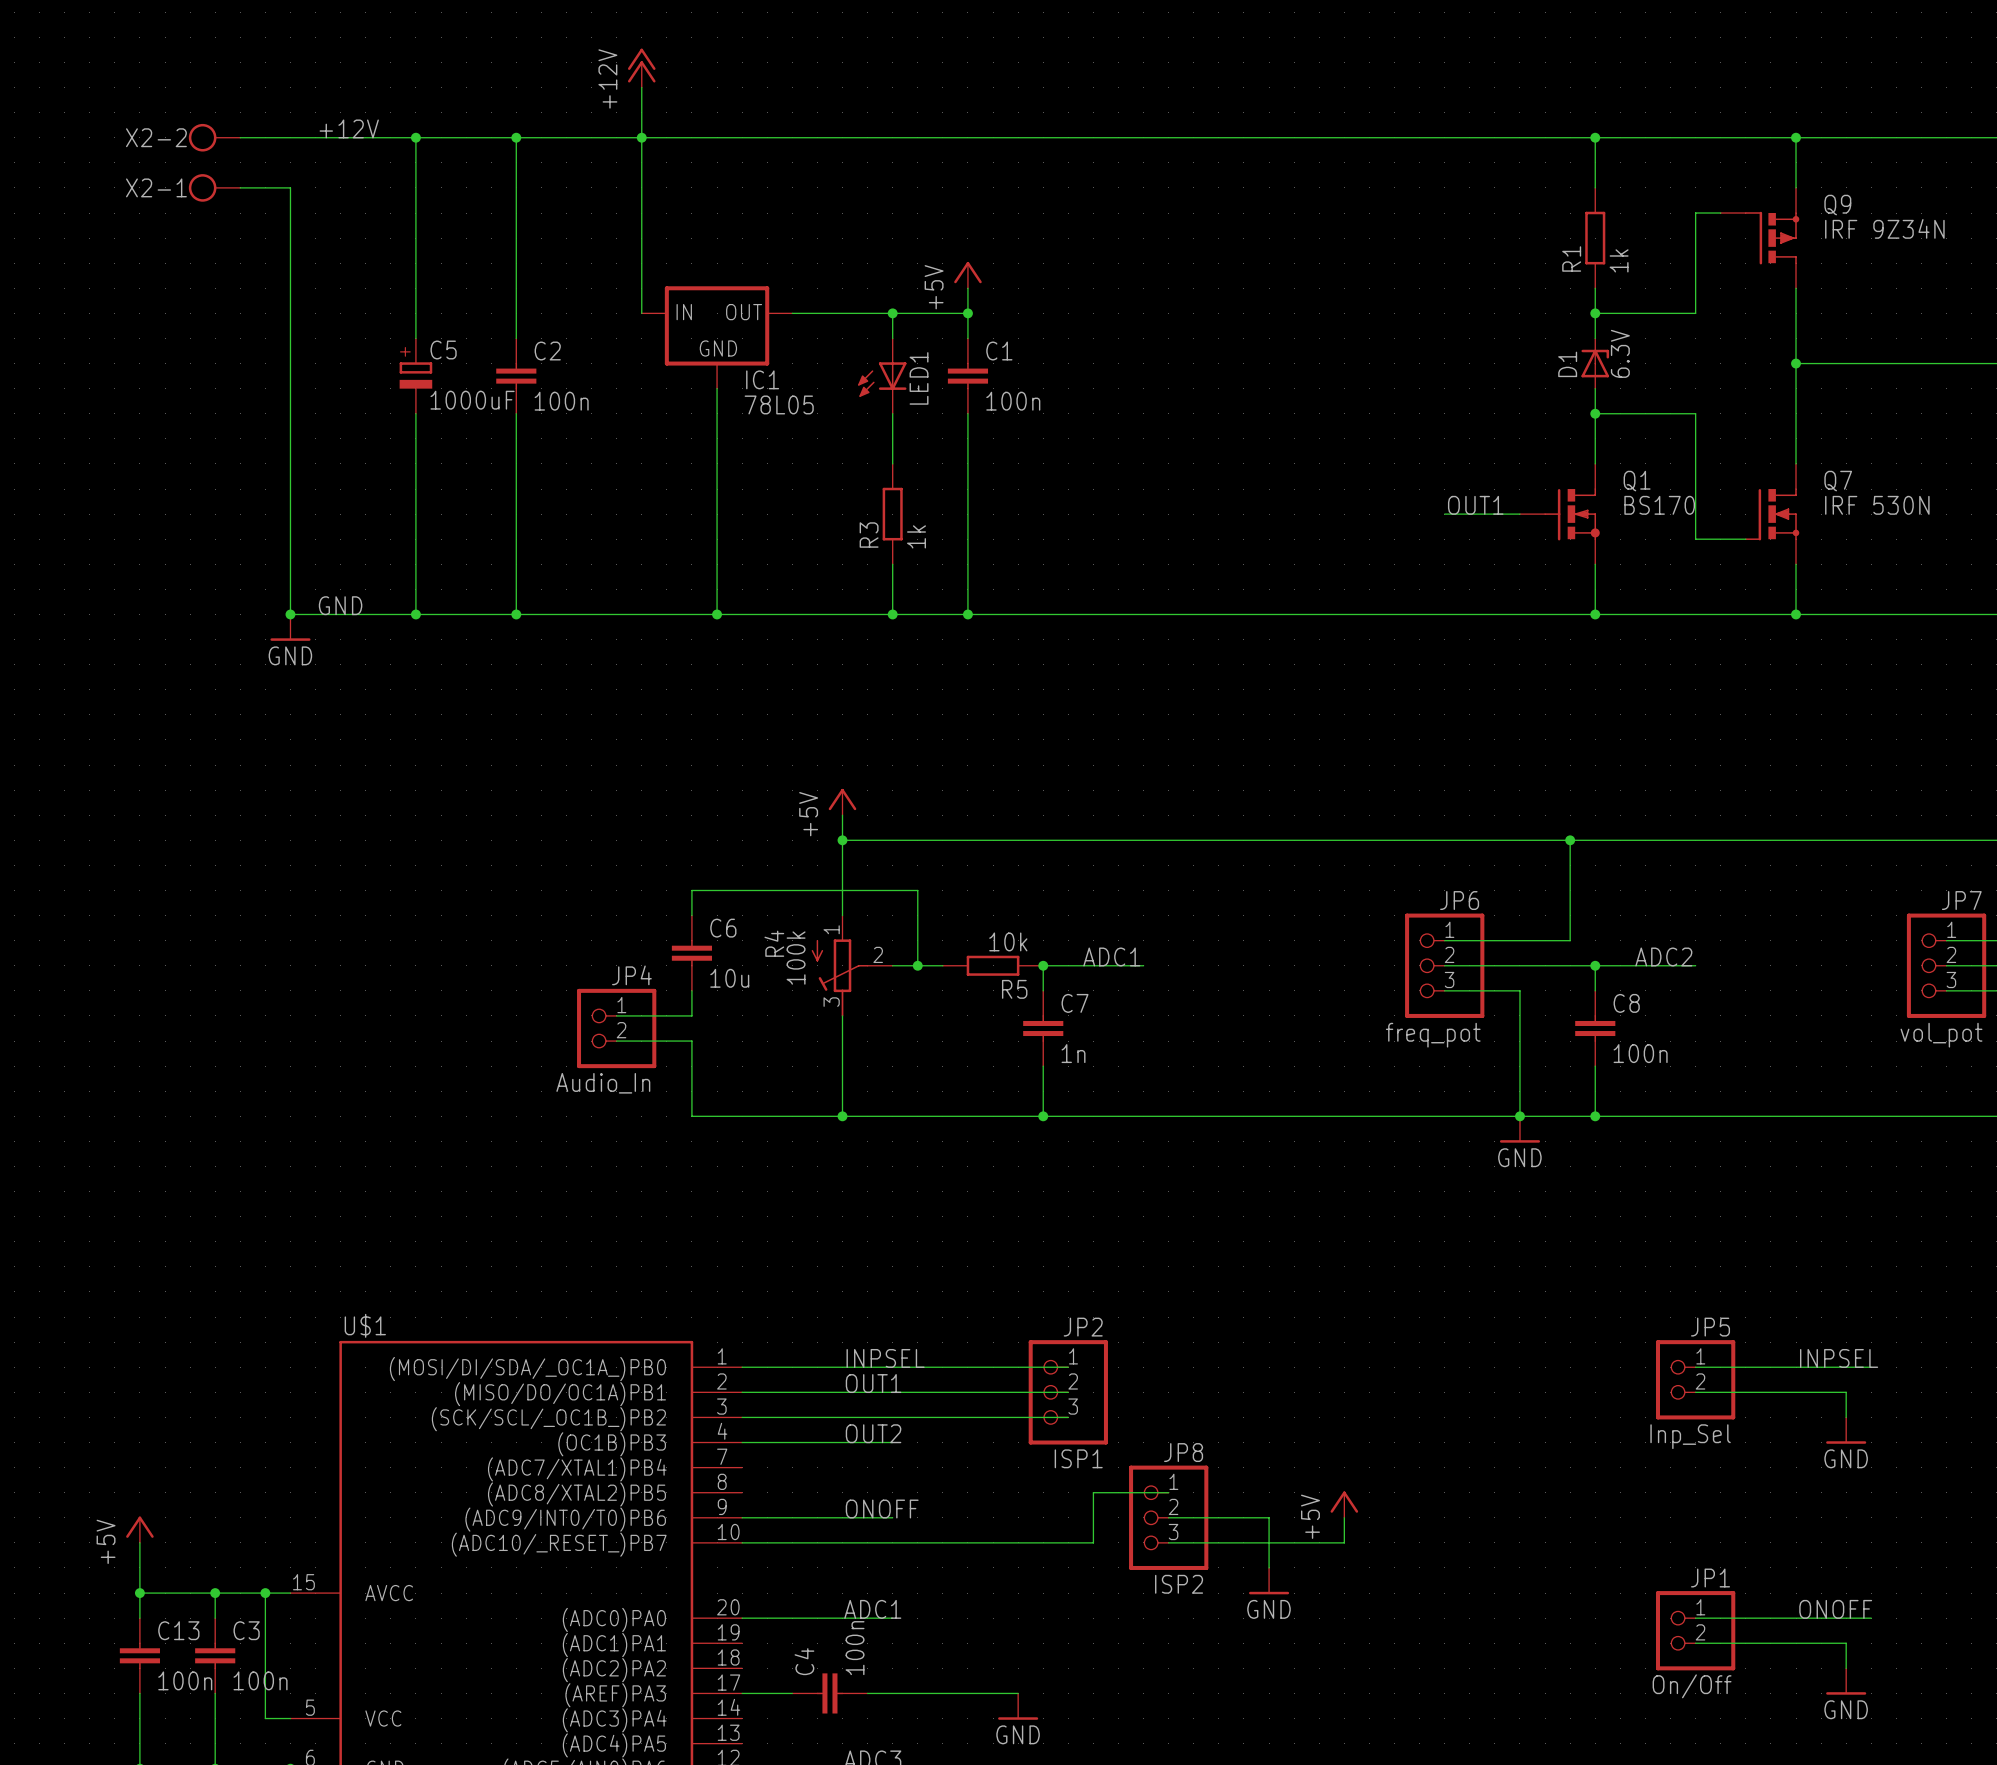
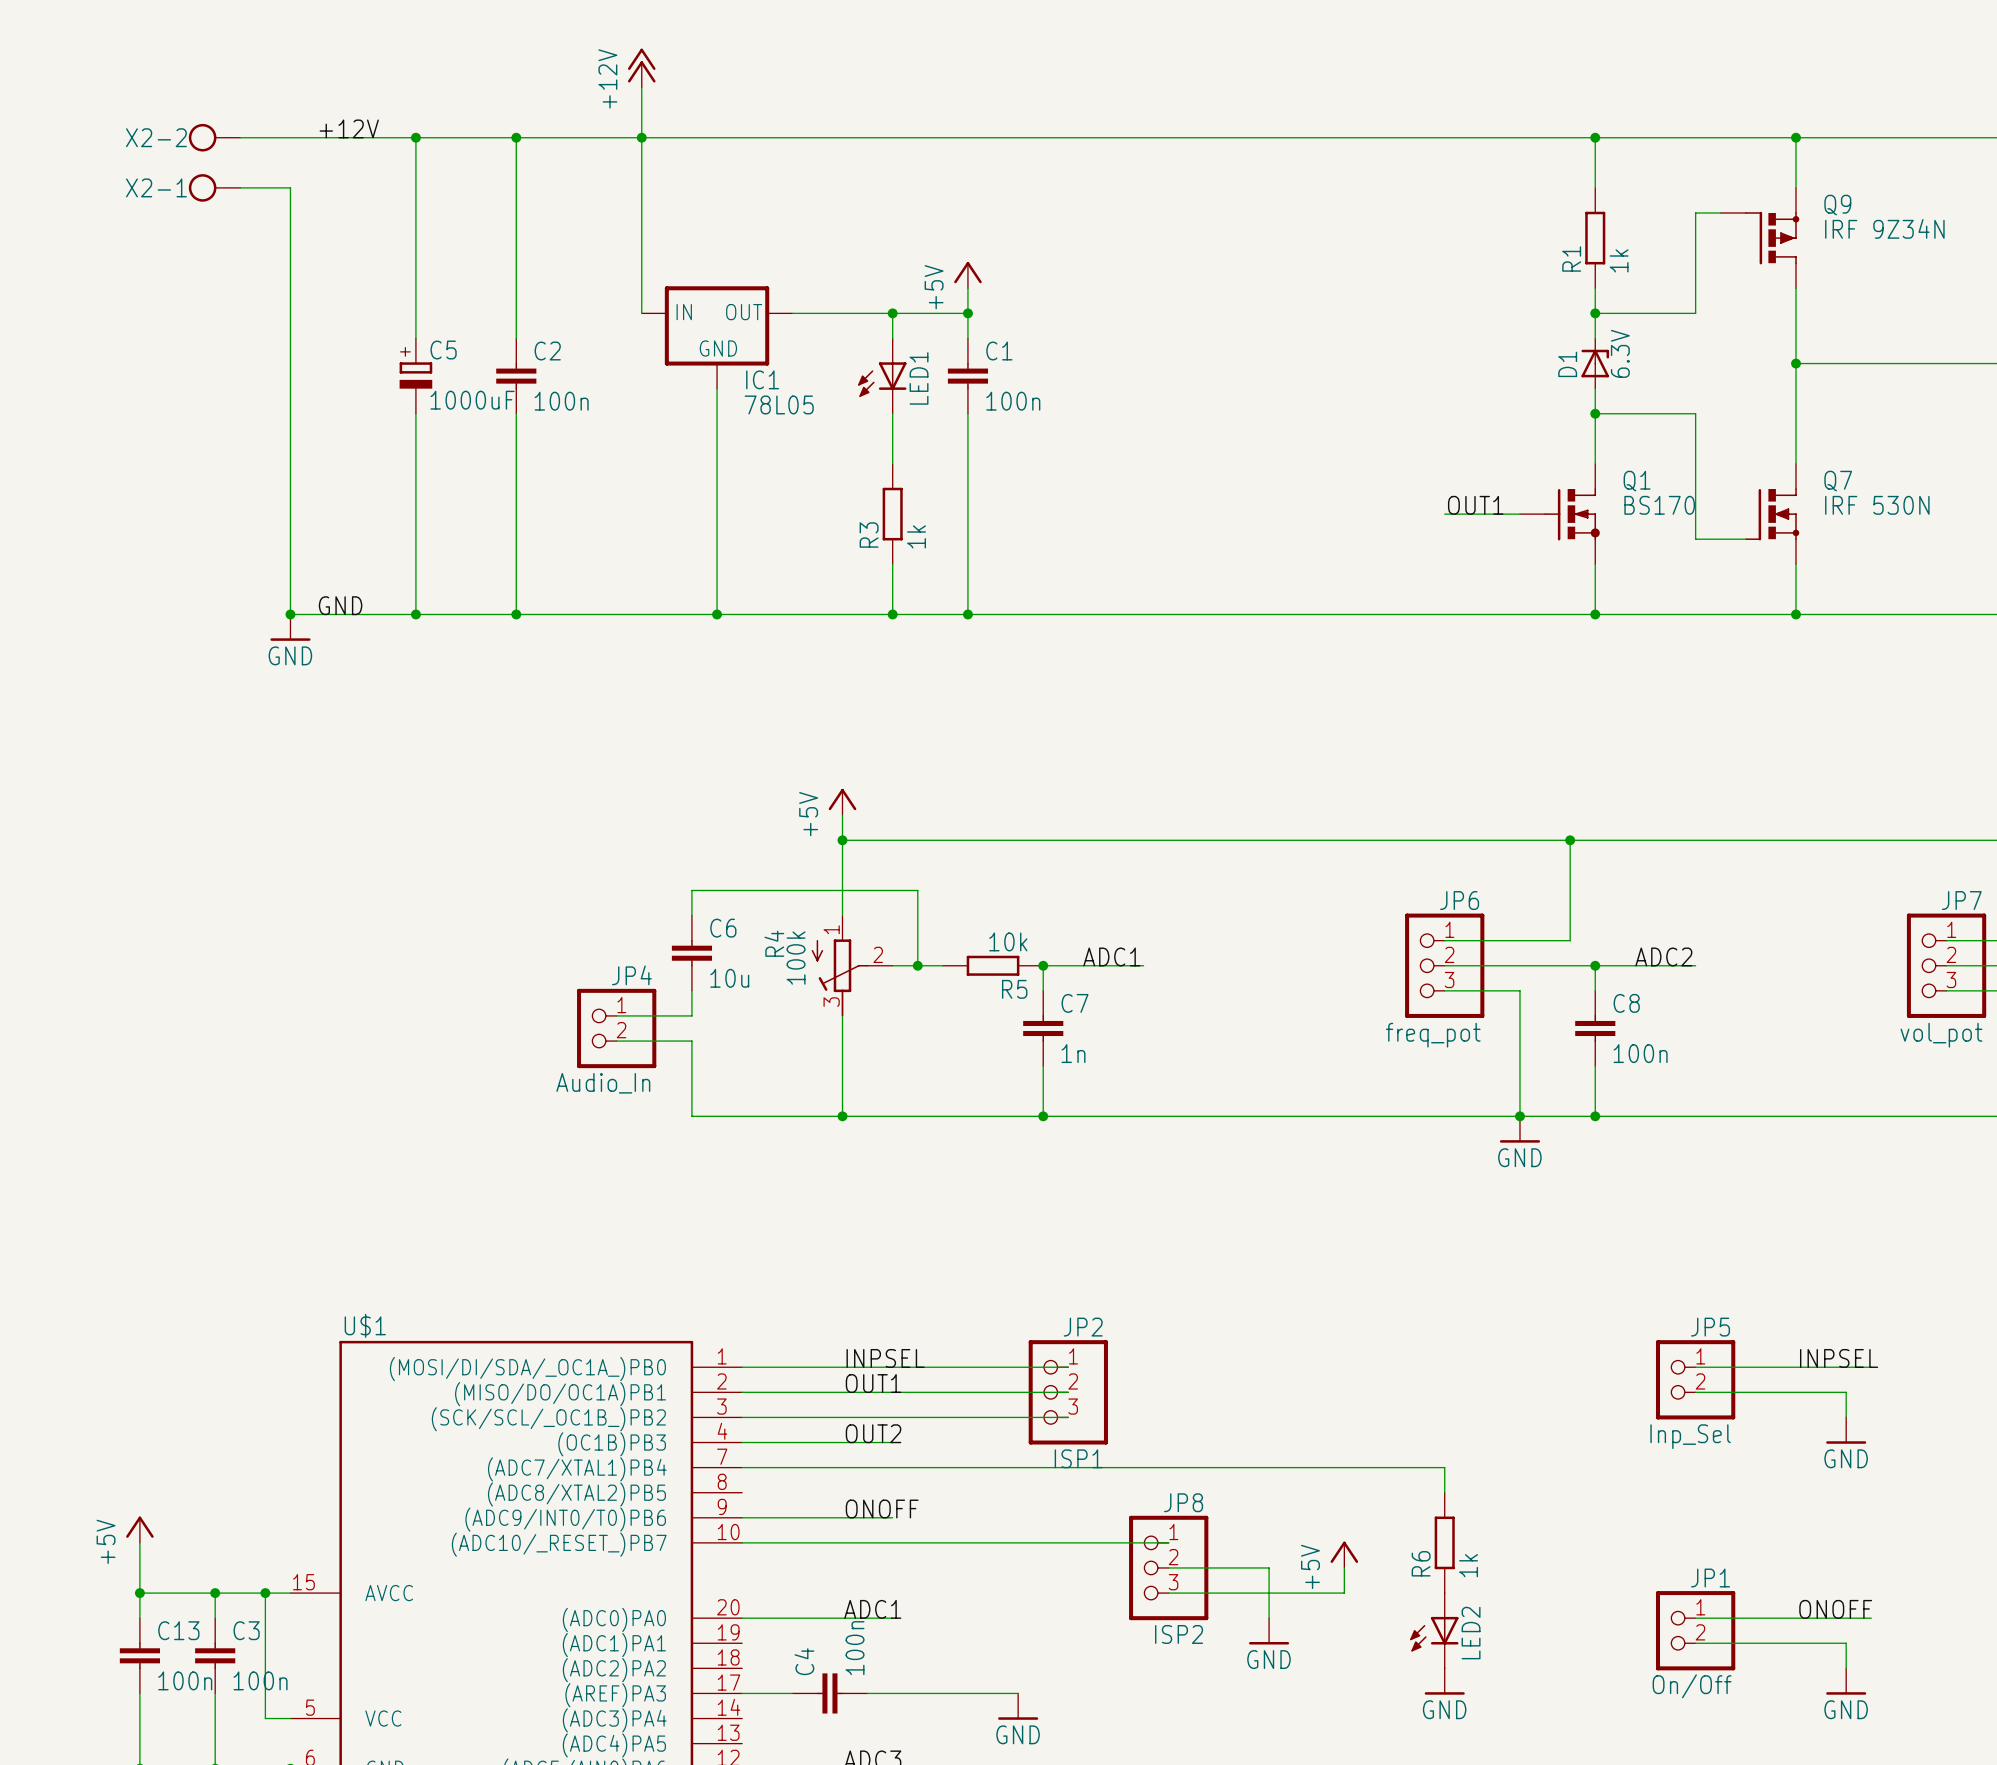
wire: none -> (742, 1467) (1444, 1467) (1444, 1492)
wire: (1168, 1492) (1093, 1492) (1093, 1542) -> (1168, 1542) (1093, 1542)
power symbol position: +5V (1344, 1504) -> +5V (1344, 1554)
wire: (1168, 1517) (1269, 1517) (1269, 1567) -> (1168, 1567) (1269, 1567) (1269, 1618)
JP8 position: (1168, 1517) -> (1168, 1567)
wire: (1344, 1517) (1344, 1542) (1168, 1542) -> (1344, 1567) (1344, 1593) (1168, 1593)
R6: none -> 1k (1444, 1542)
power symbol position: GND (1269, 1581) -> GND (1269, 1631)
LED2: none -> (1434, 1630)
power symbol: none -> GND (1444, 1681)

